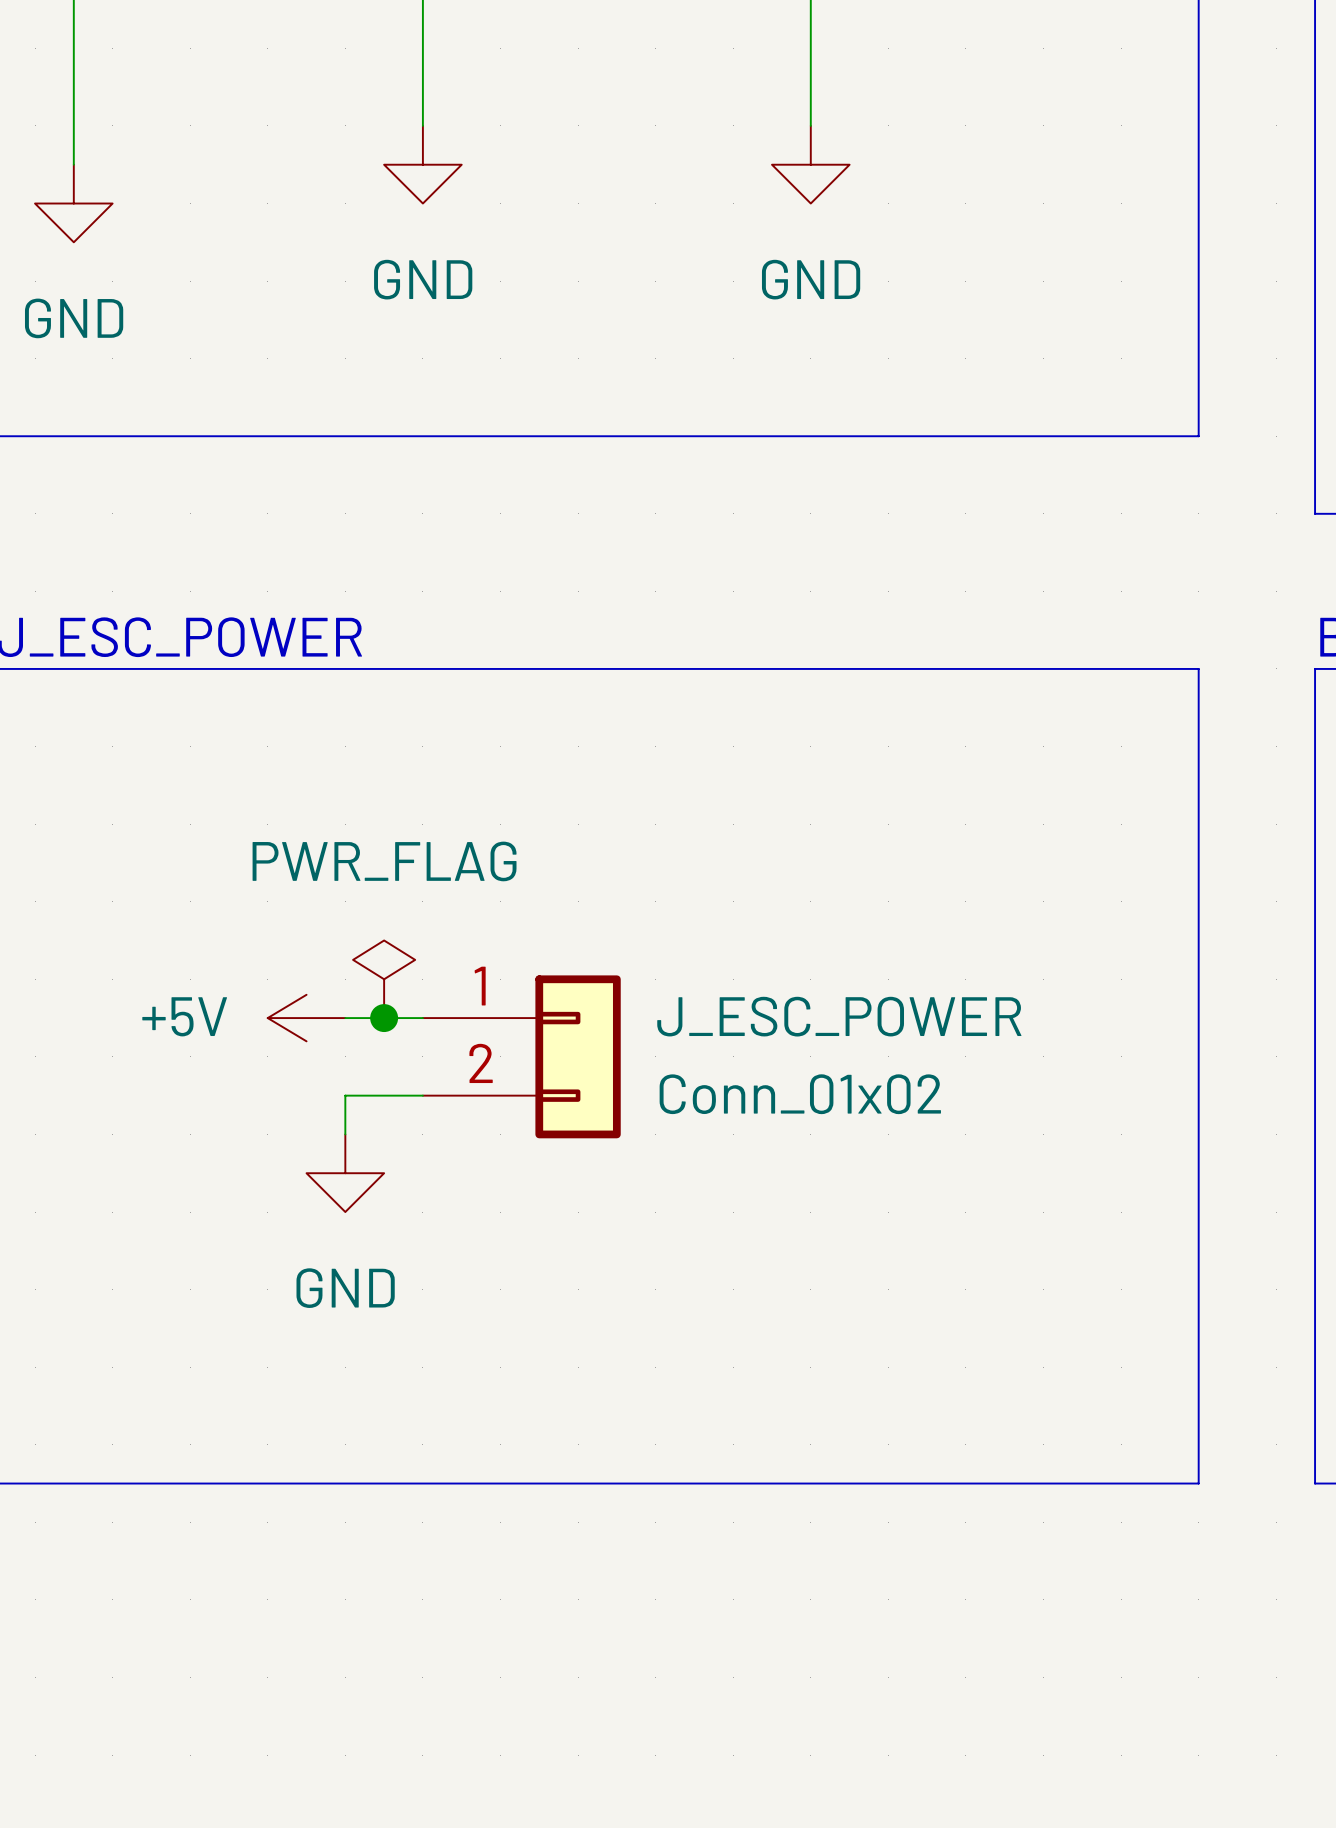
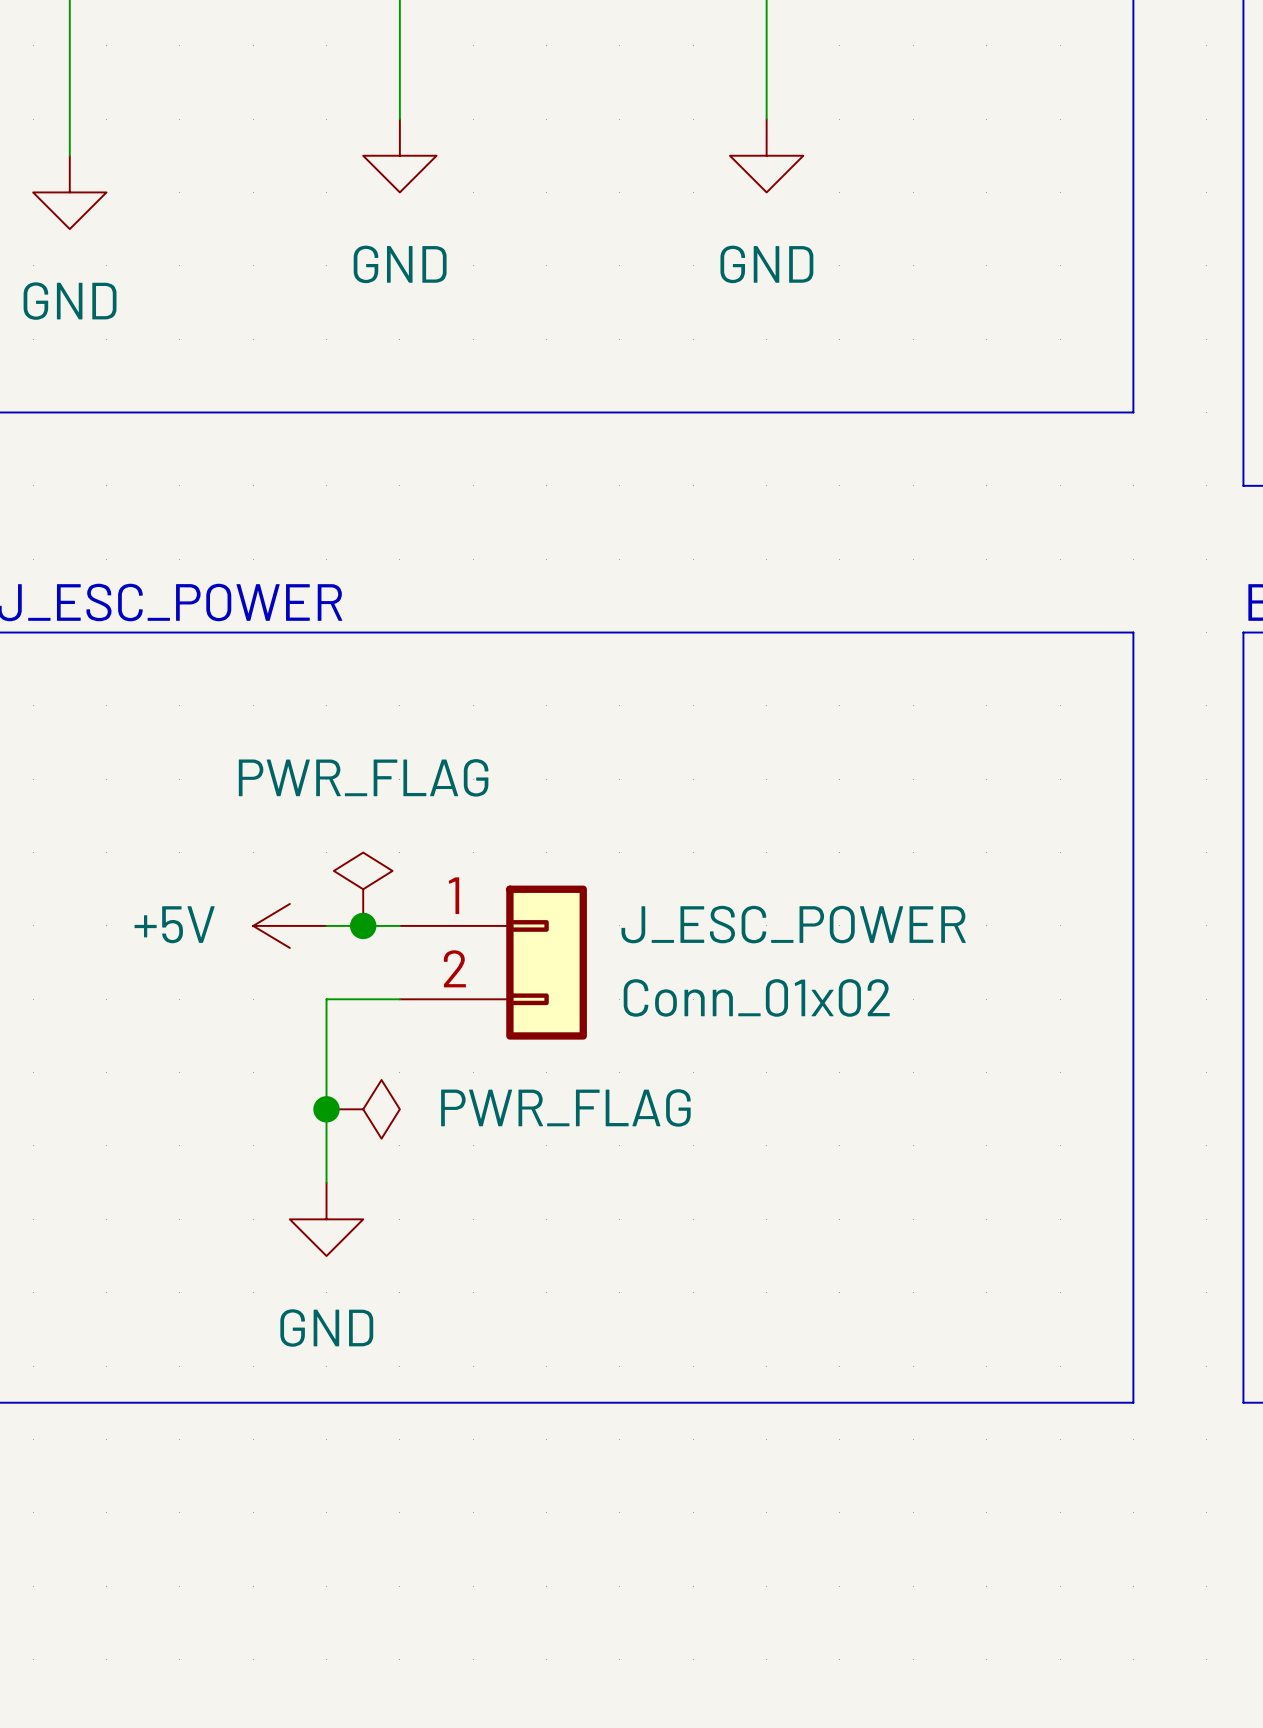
power symbol position: PWR_FLAG (384, 979) -> PWR_FLAG (363, 889)
power symbol position: +5V (306, 1018) -> +5V (289, 925)
wire: (345, 1018) (422, 1018) -> (326, 925) (399, 925)
junction position: (384, 1018) -> (363, 925)
J_ESC_POWER position: (521, 1056) -> (493, 962)
wire: (345, 1095) (422, 1095) -> (326, 1035) (326, 999) (399, 999)
wire: none -> (326, 1072) (326, 1182)
junction: none -> (326, 1109)
power symbol position: GND (345, 1173) -> GND (326, 1219)
power symbol: none -> PWR_FLAG (363, 1109)

